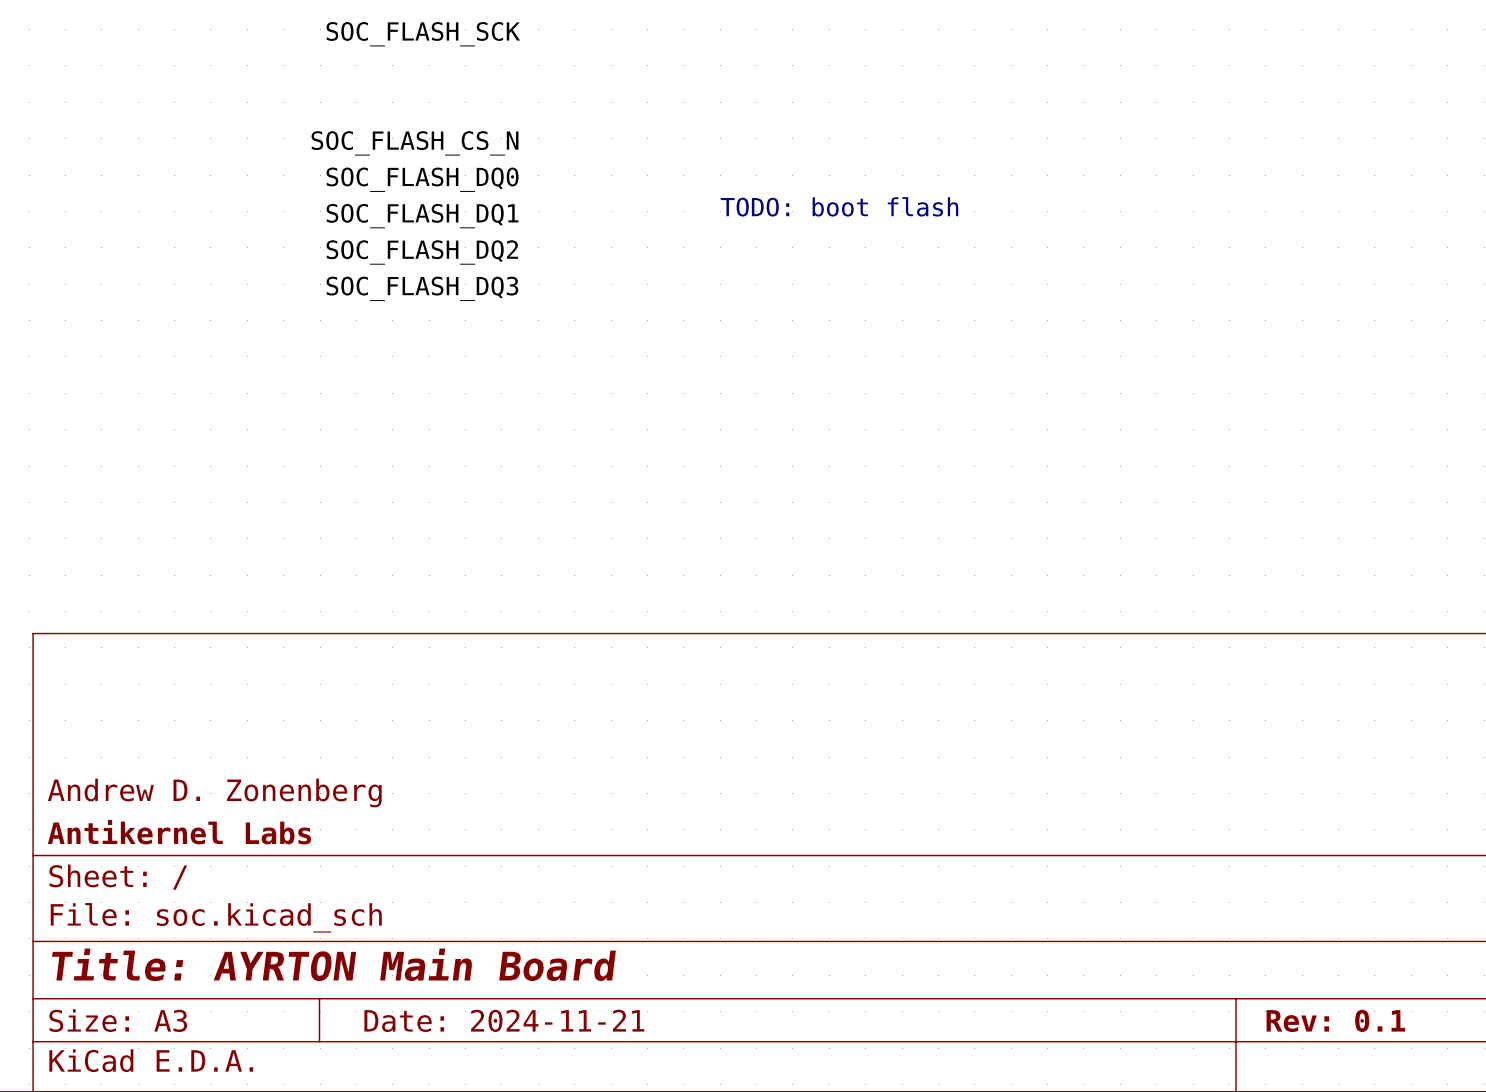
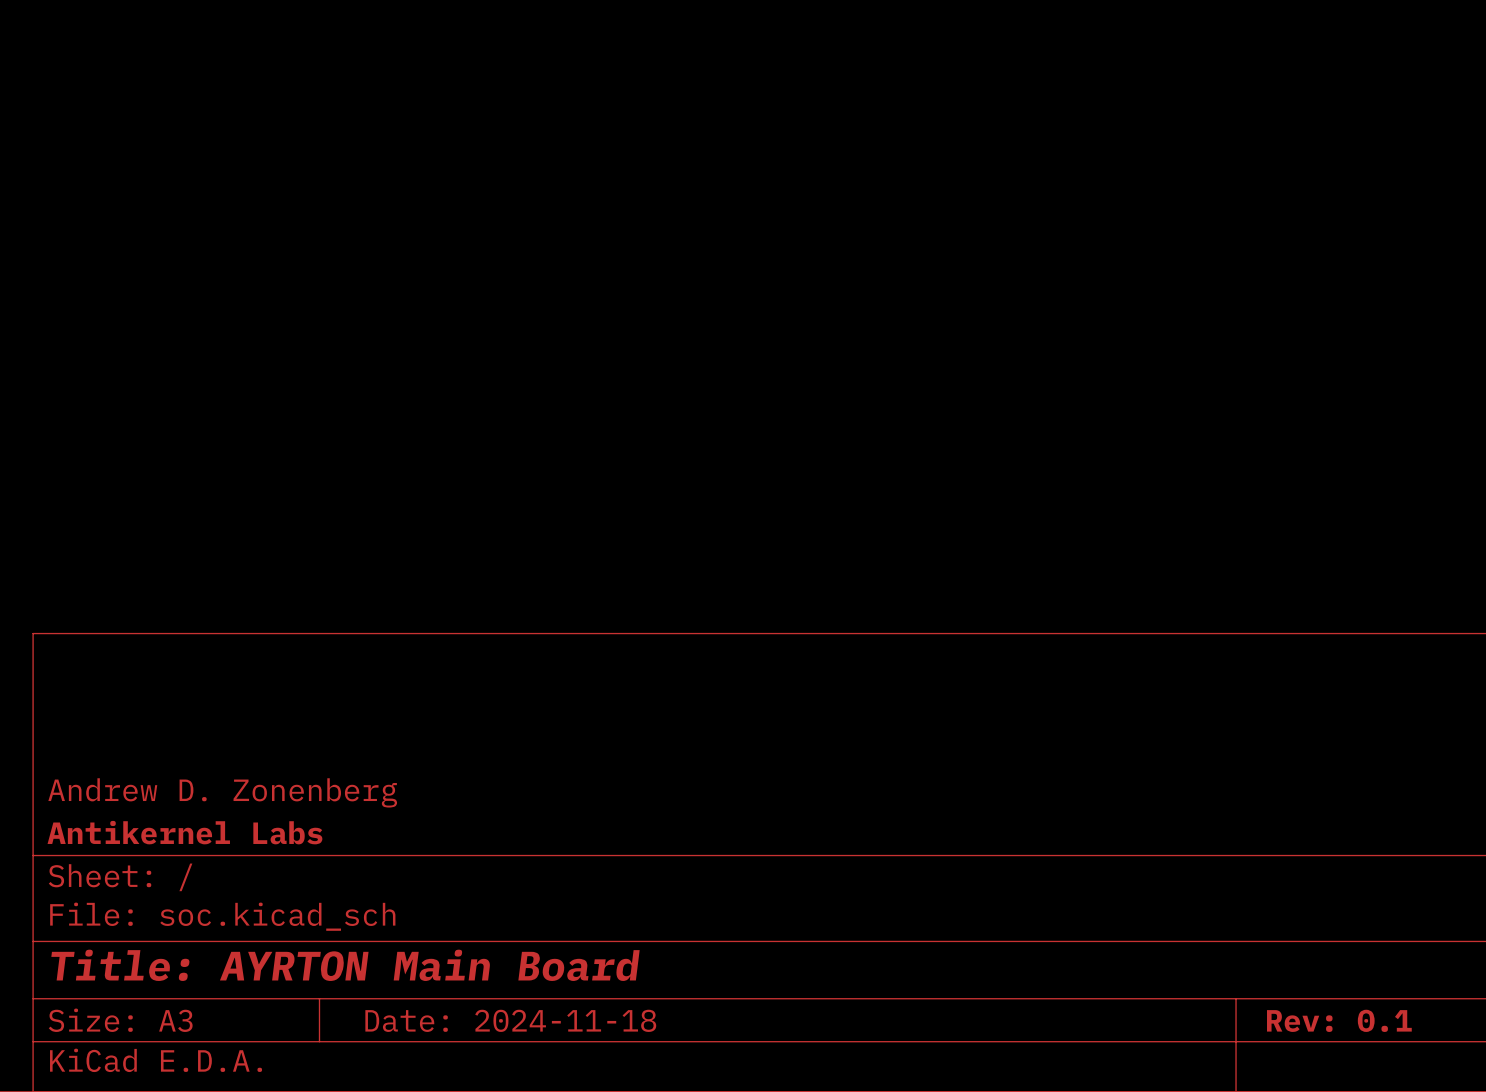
label: SOC_FLASH_SCK (423, 34) -> none
label: SOC_FLASH_CS_N (414, 143) -> none
label: SOC_FLASH_DQ0 (422, 179) -> none
text: TODO: boot flash (839, 206) -> none
label: SOC_FLASH_DQ1 (422, 216) -> none
label: SOC_FLASH_DQ2 (422, 252) -> none
label: SOC_FLASH_DQ3 (422, 288) -> none
title block: Date: 2024-11-21 (504, 1020) -> Date: 2024-11-18 (510, 1020)

